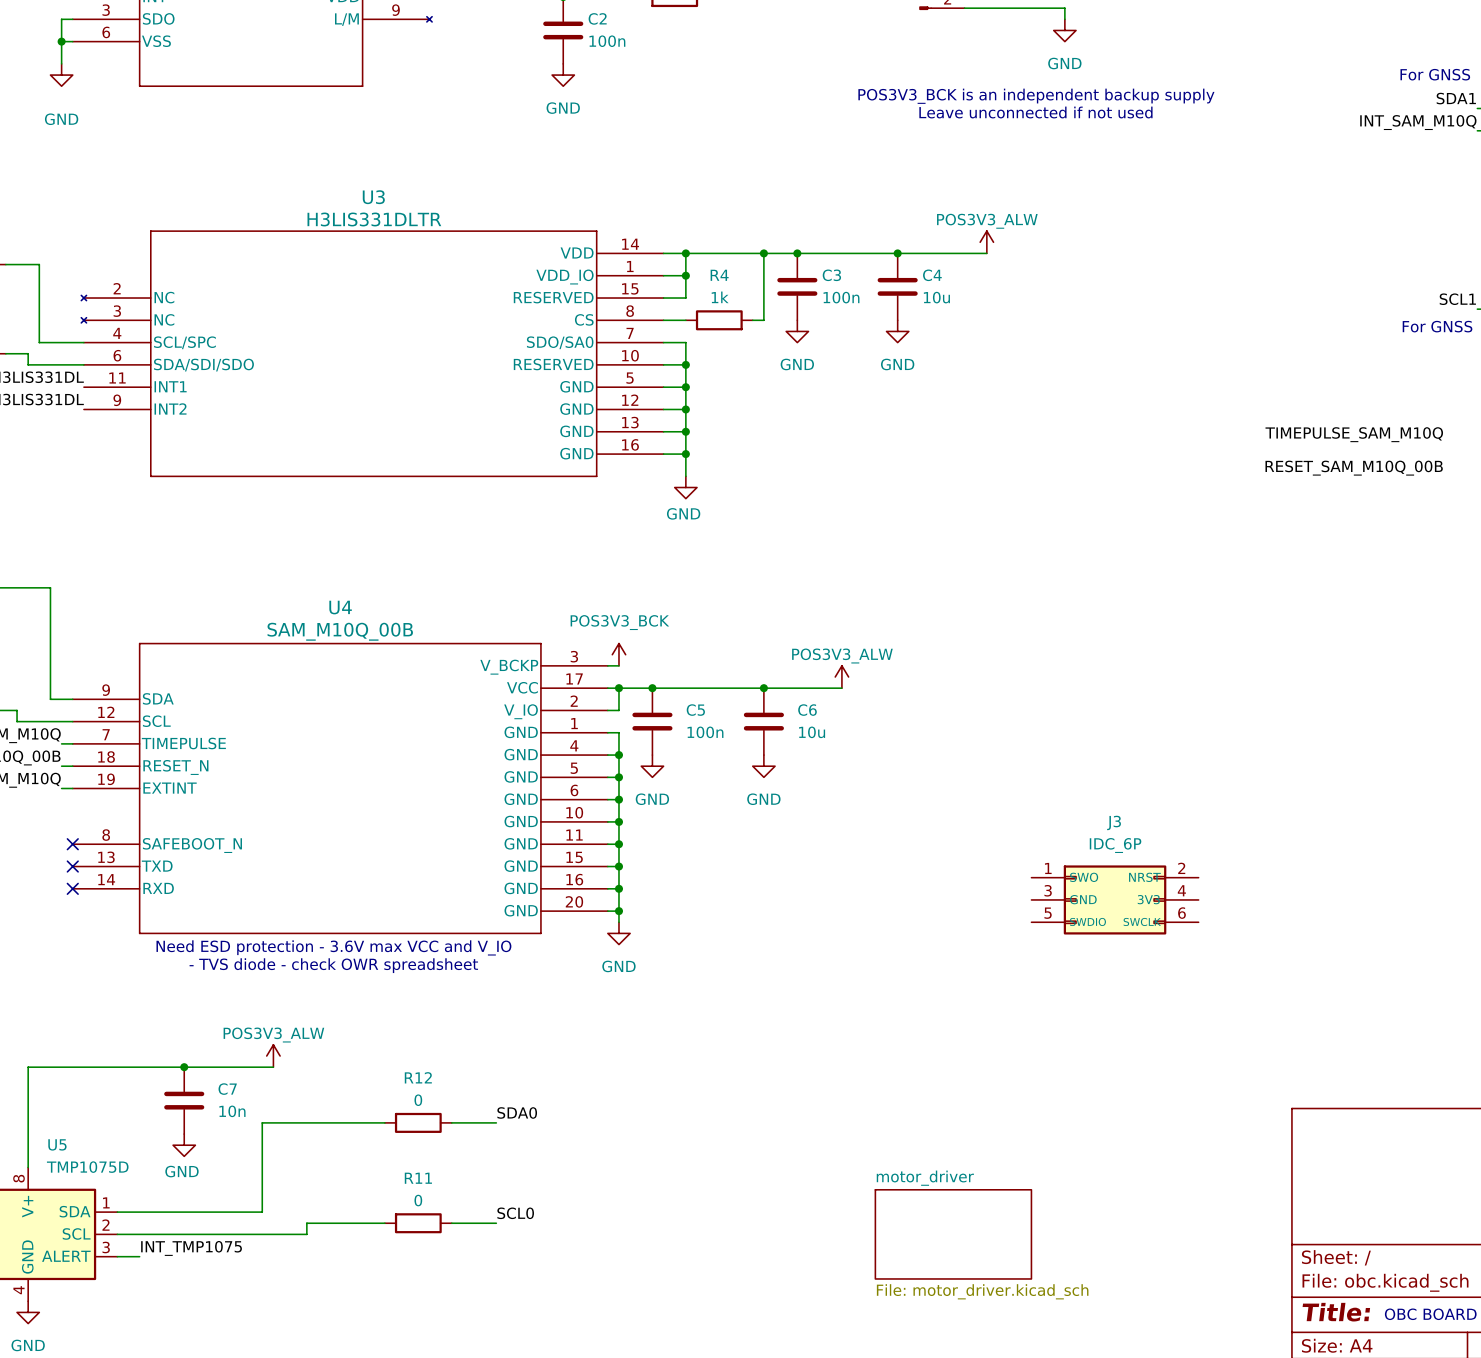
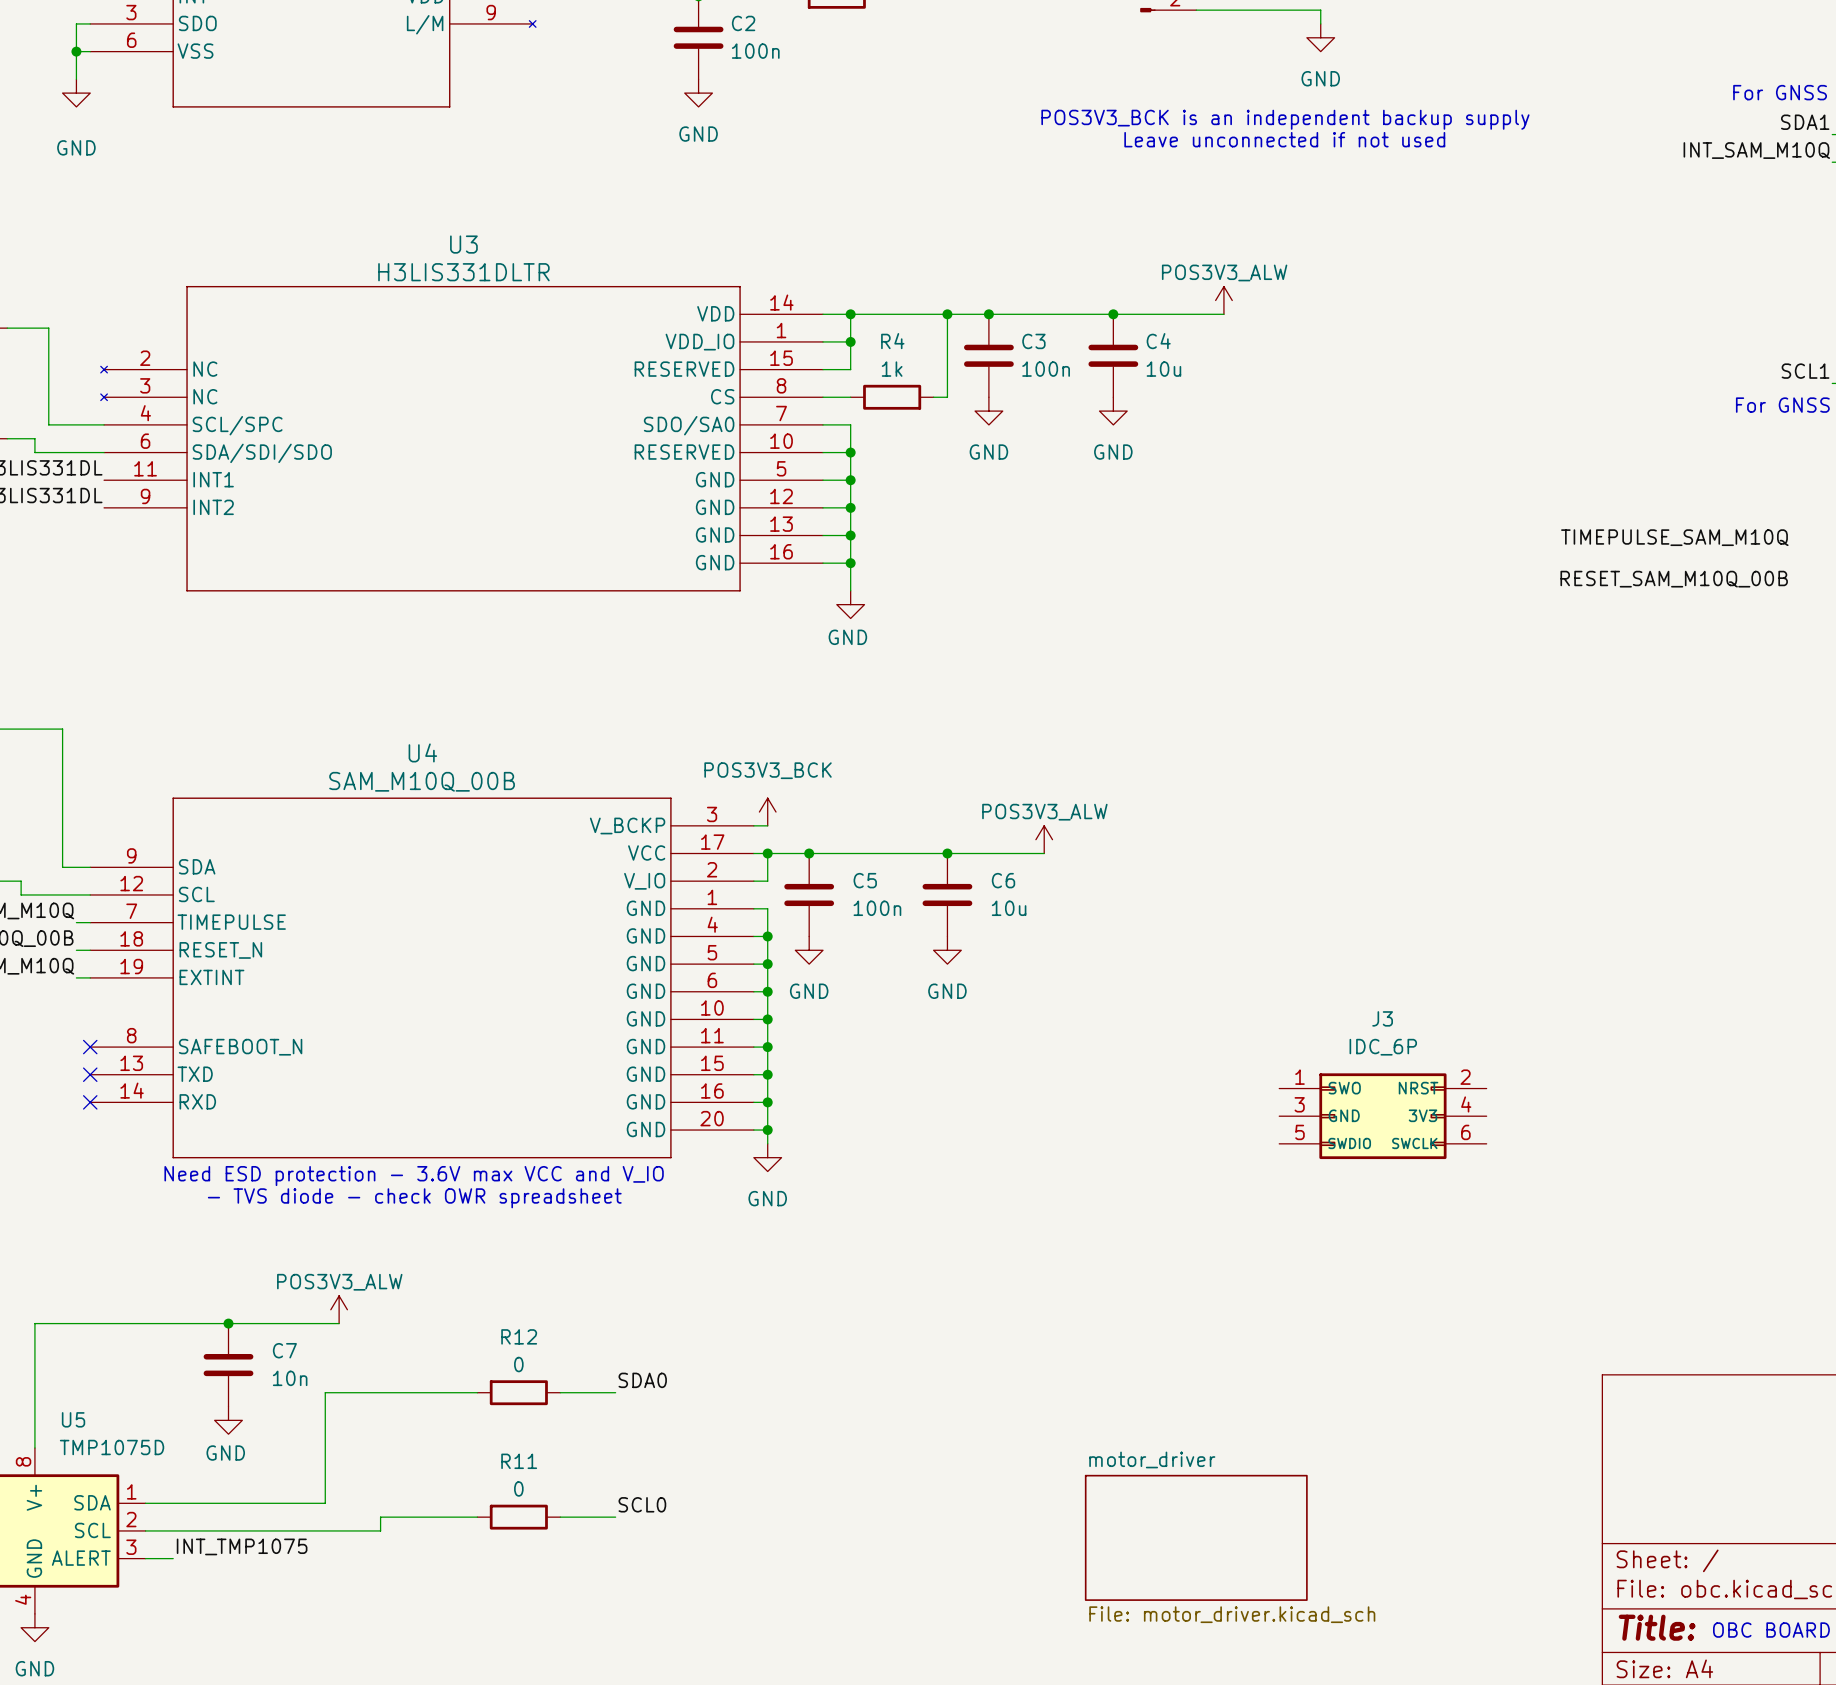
sheet motor_driver: File: motor_driver.kicad_sch (953, 1234) -> none
sheet motor_driver: none -> File: motor_driver.kicad_sch (1196, 1537)

